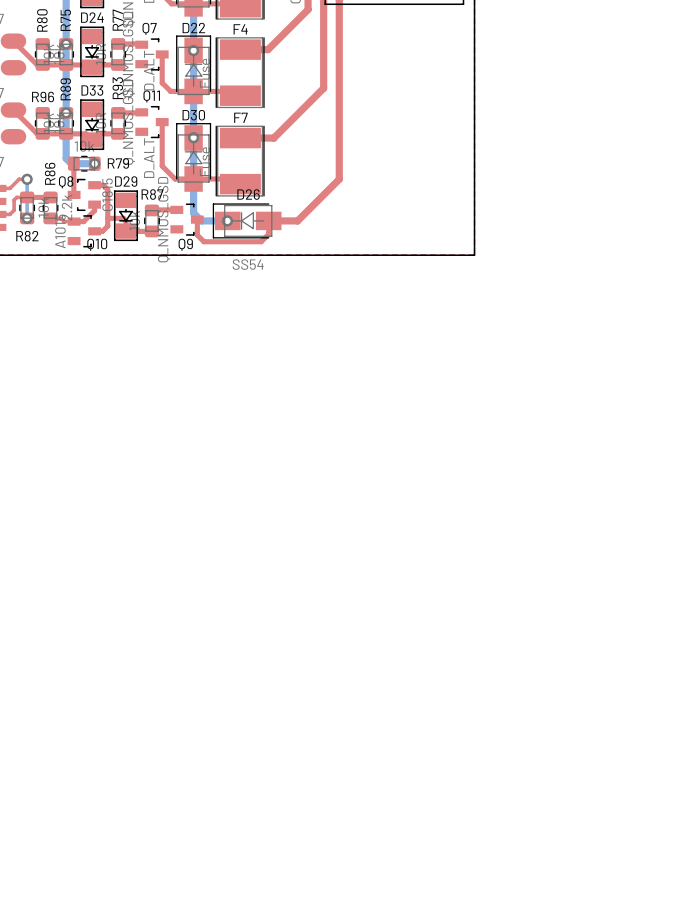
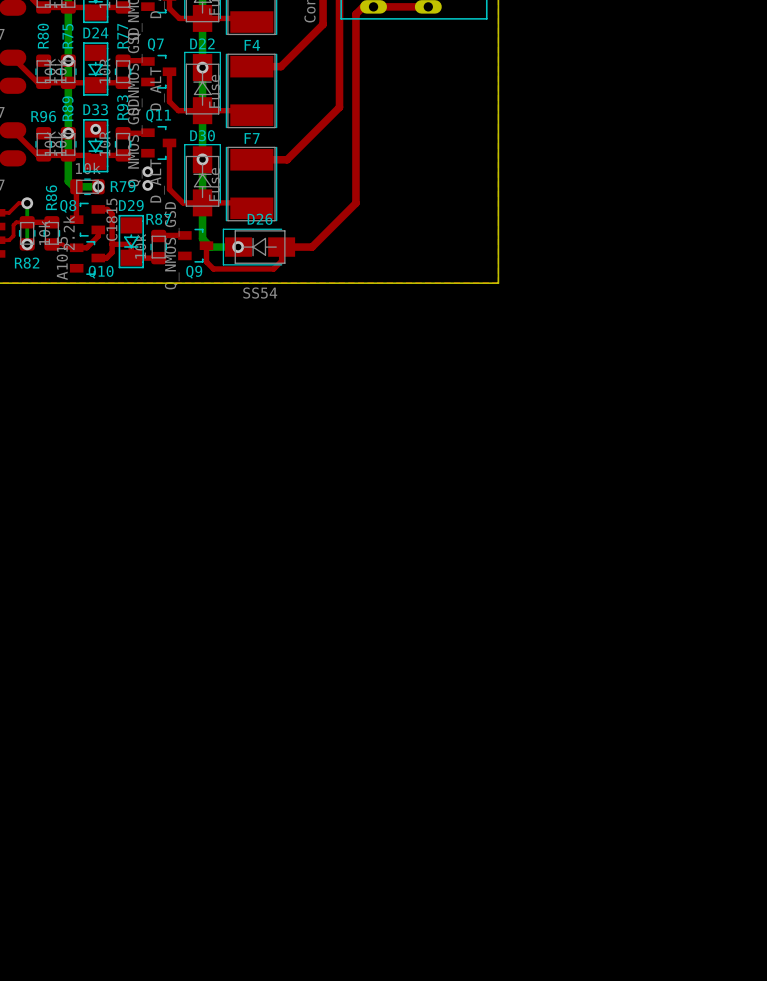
via: none -> (95, 129)
via: none -> (147, 171)
via: none -> (147, 185)

